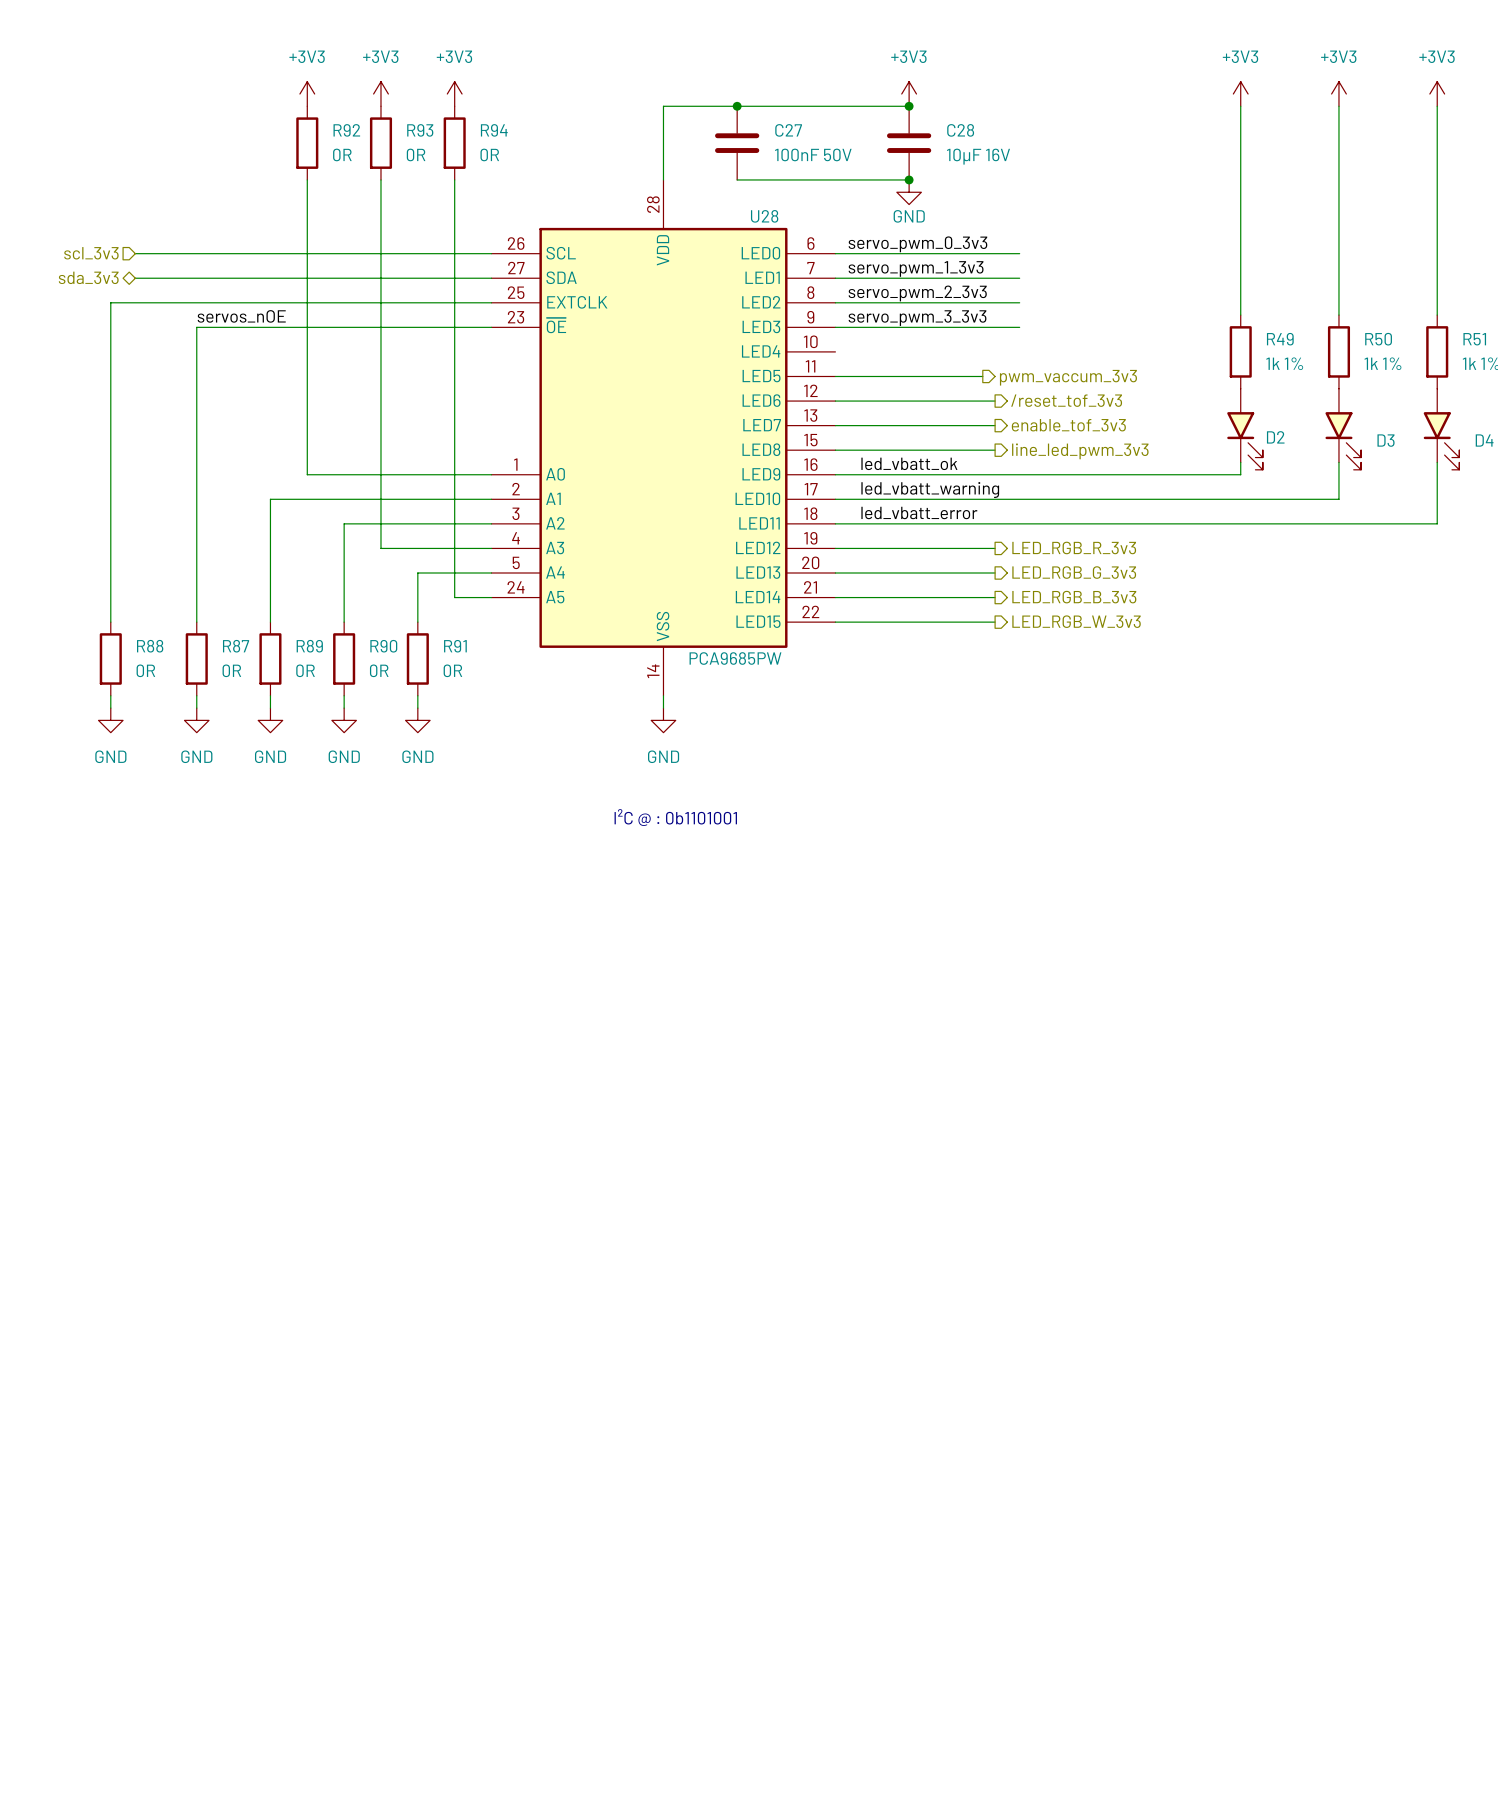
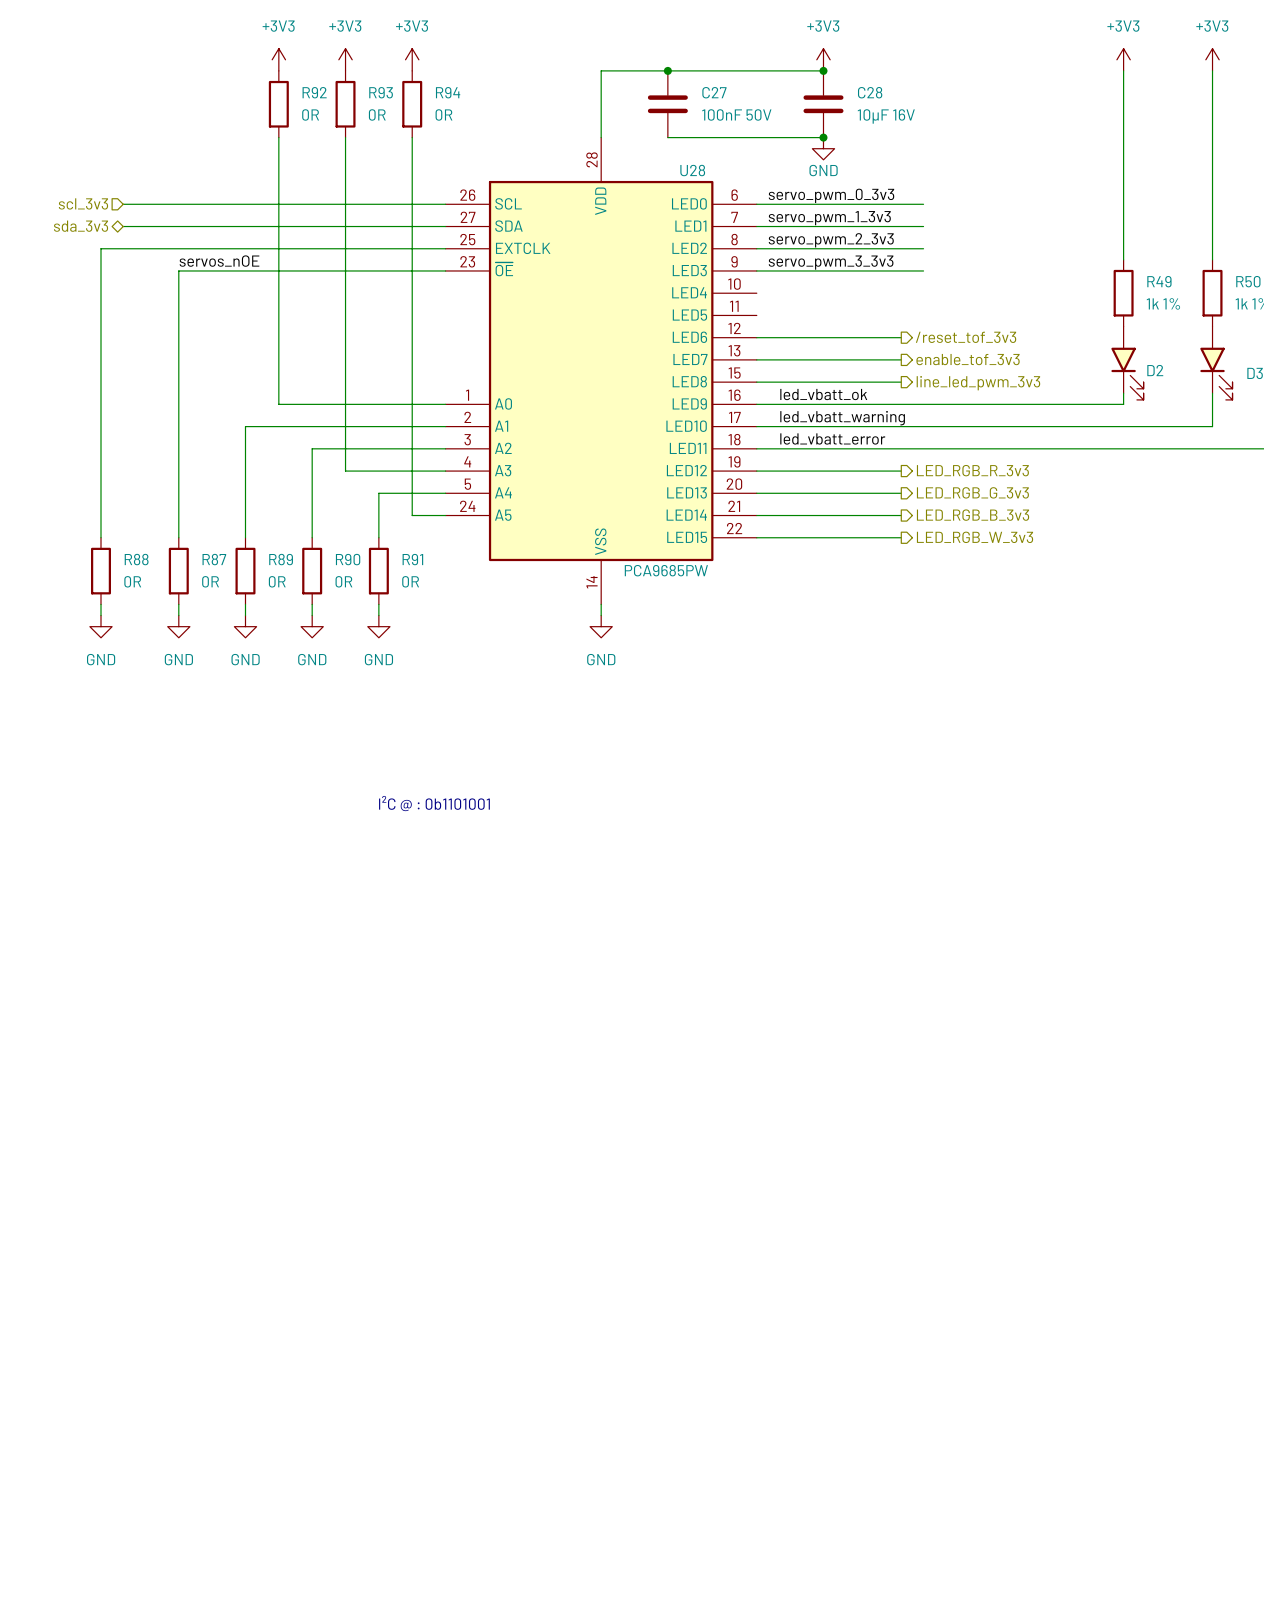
wire: (835, 376) (982, 376) -> none
hierarchical label: pwm_vaccum_3v3 (1068, 377) -> none
text position: I²C @ : 0b1101001 (675, 817) -> I²C @ : 0b1101001 (434, 803)

